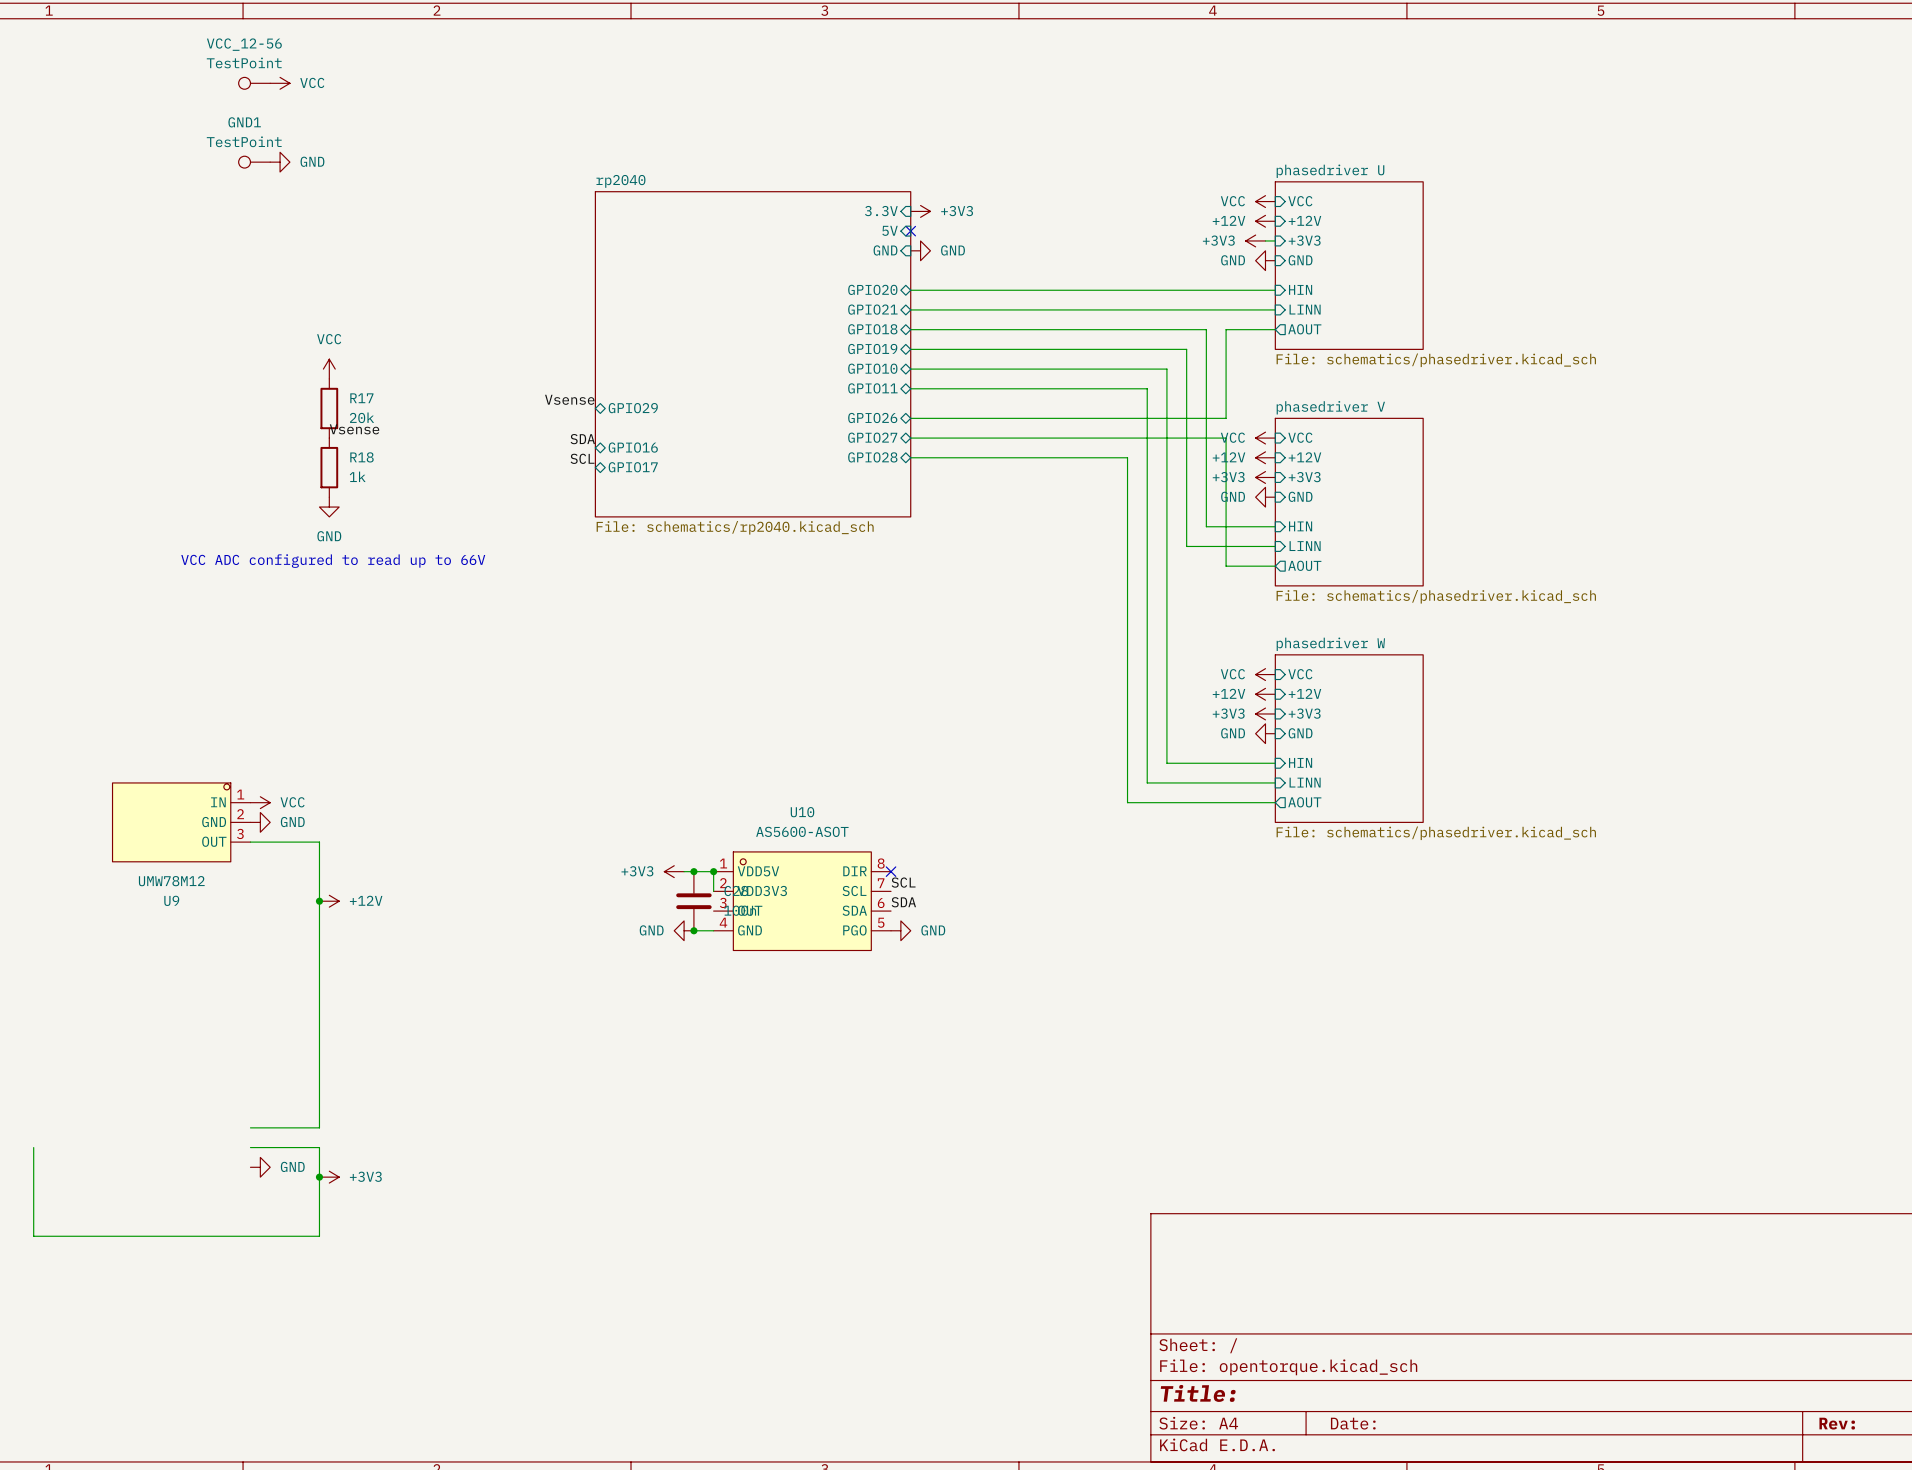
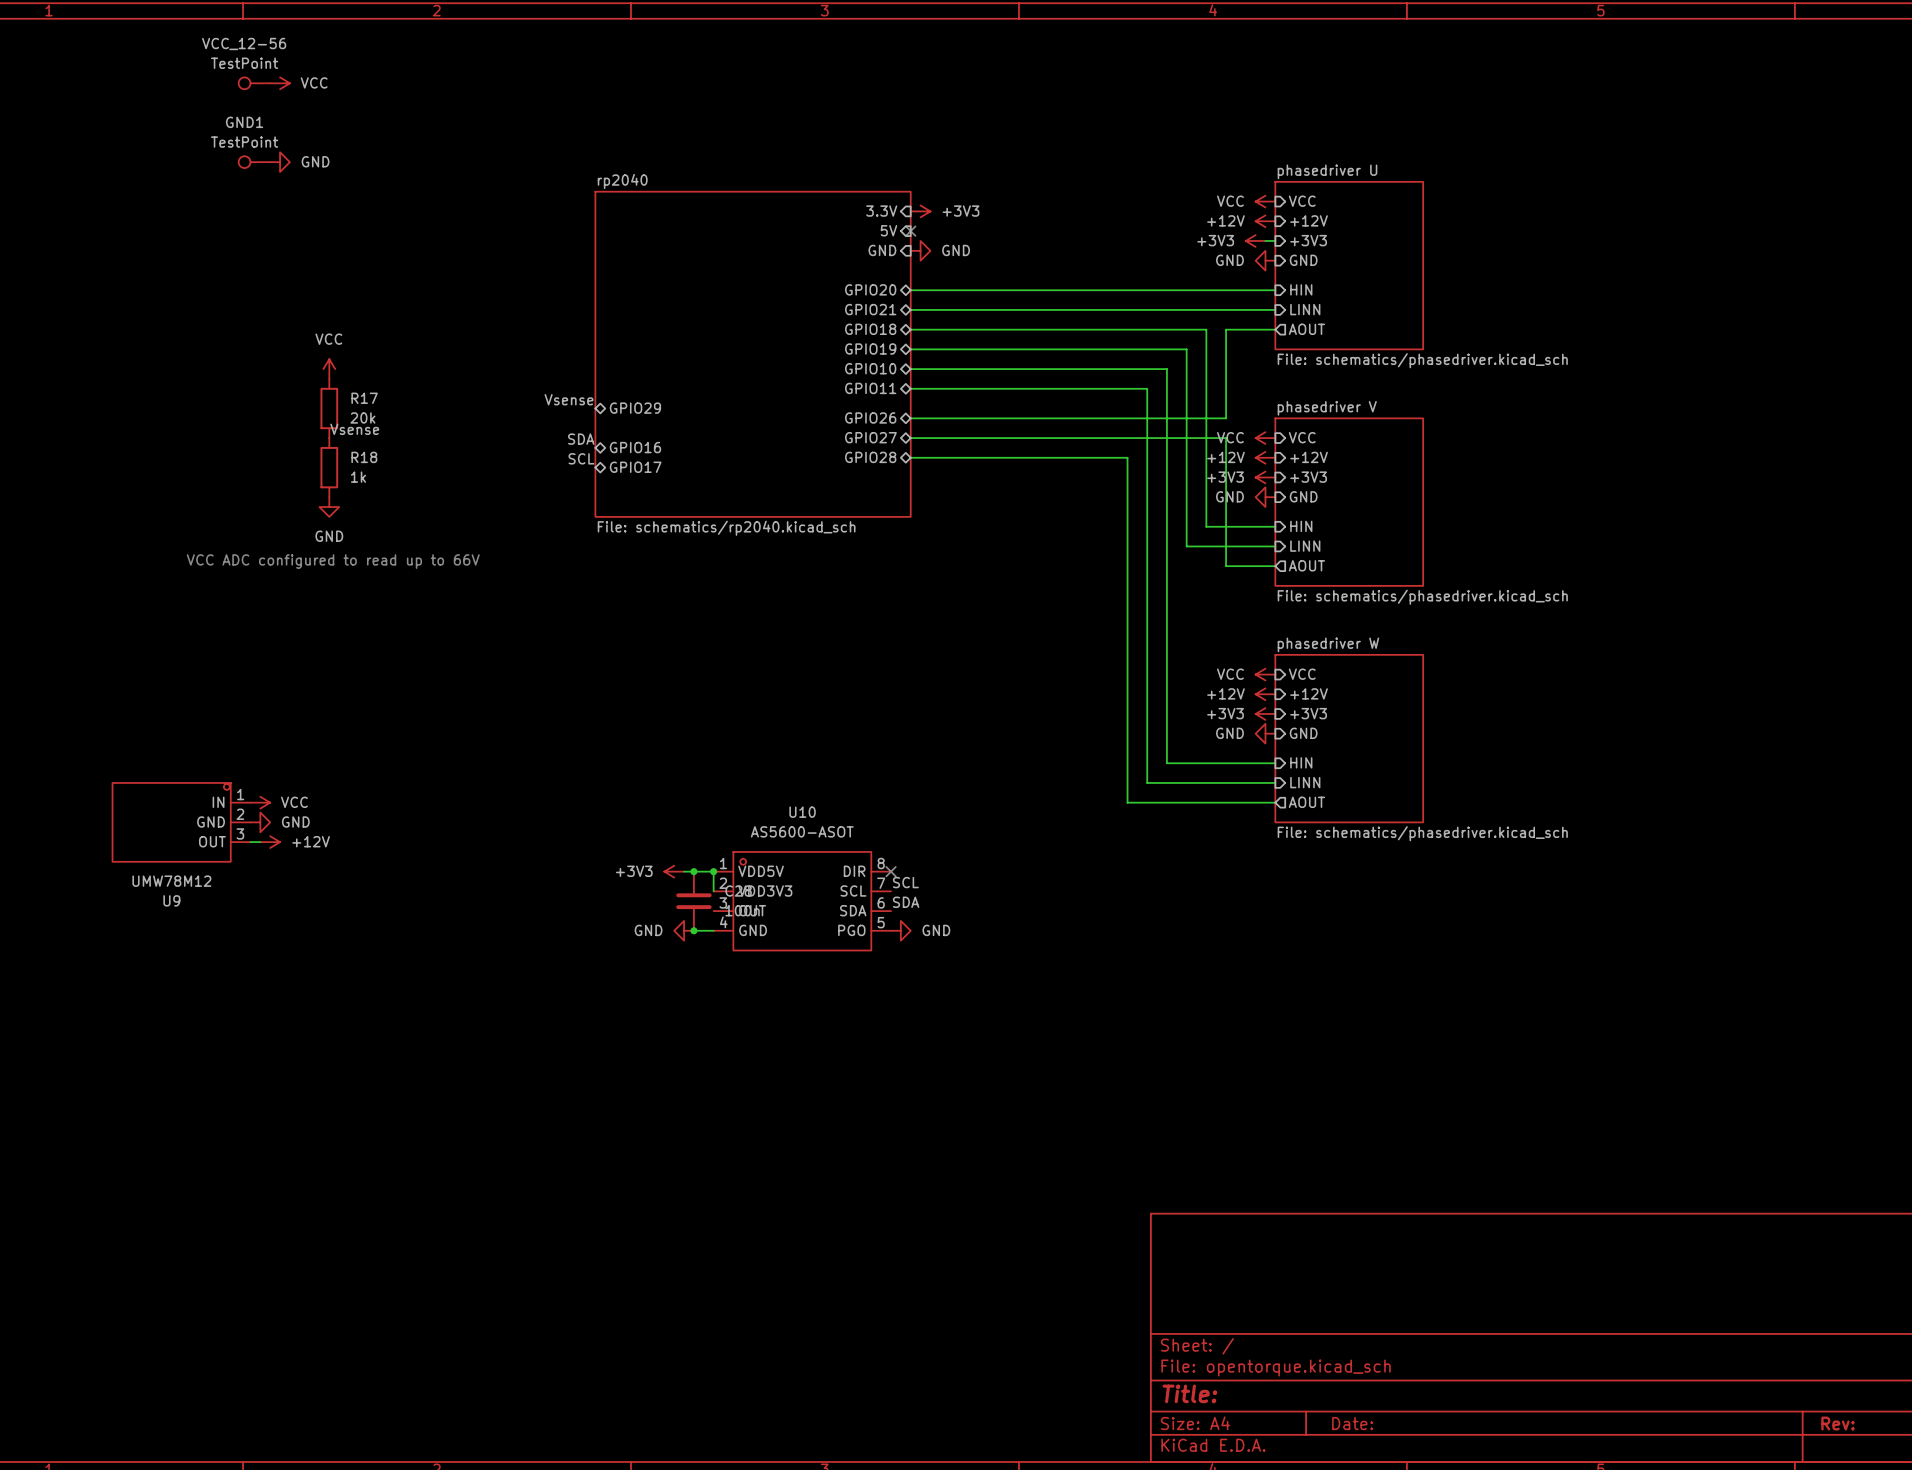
wire: (260, 842) (319, 842) (319, 1127) (250, 1127) -> none
junction: (319, 901) -> none
power symbol position: +12V (329, 901) -> +12V (270, 842)
wire: (33, 1147) (33, 1236) (319, 1236) (319, 1147) (250, 1147) -> none
power symbol: GND (260, 1167) -> none
junction: (319, 1177) -> none
power symbol: +3V3 (329, 1177) -> none

